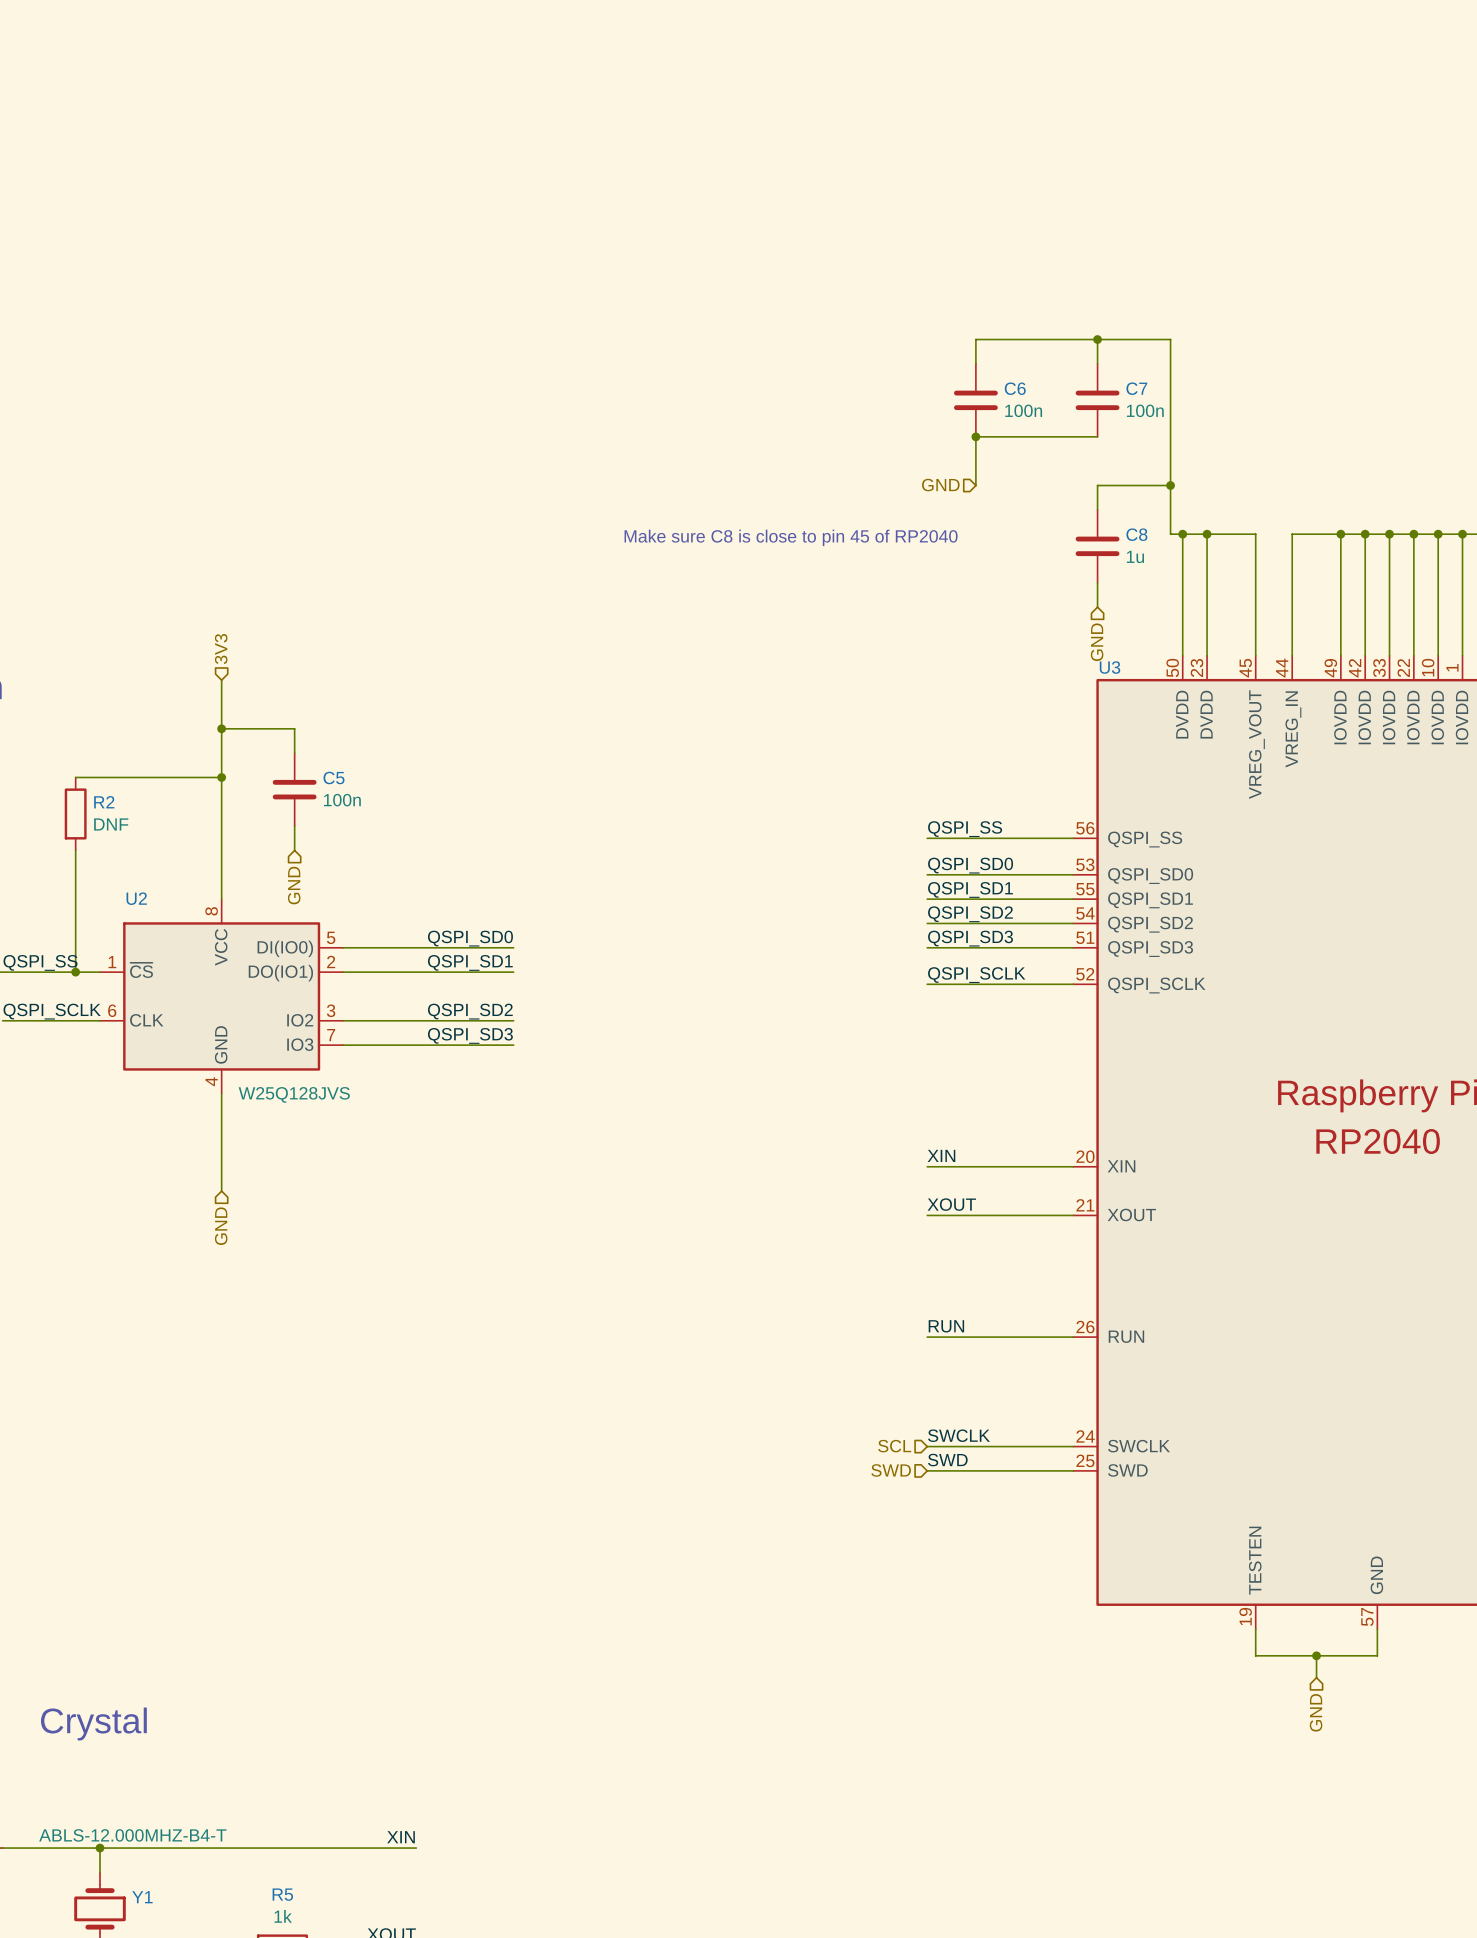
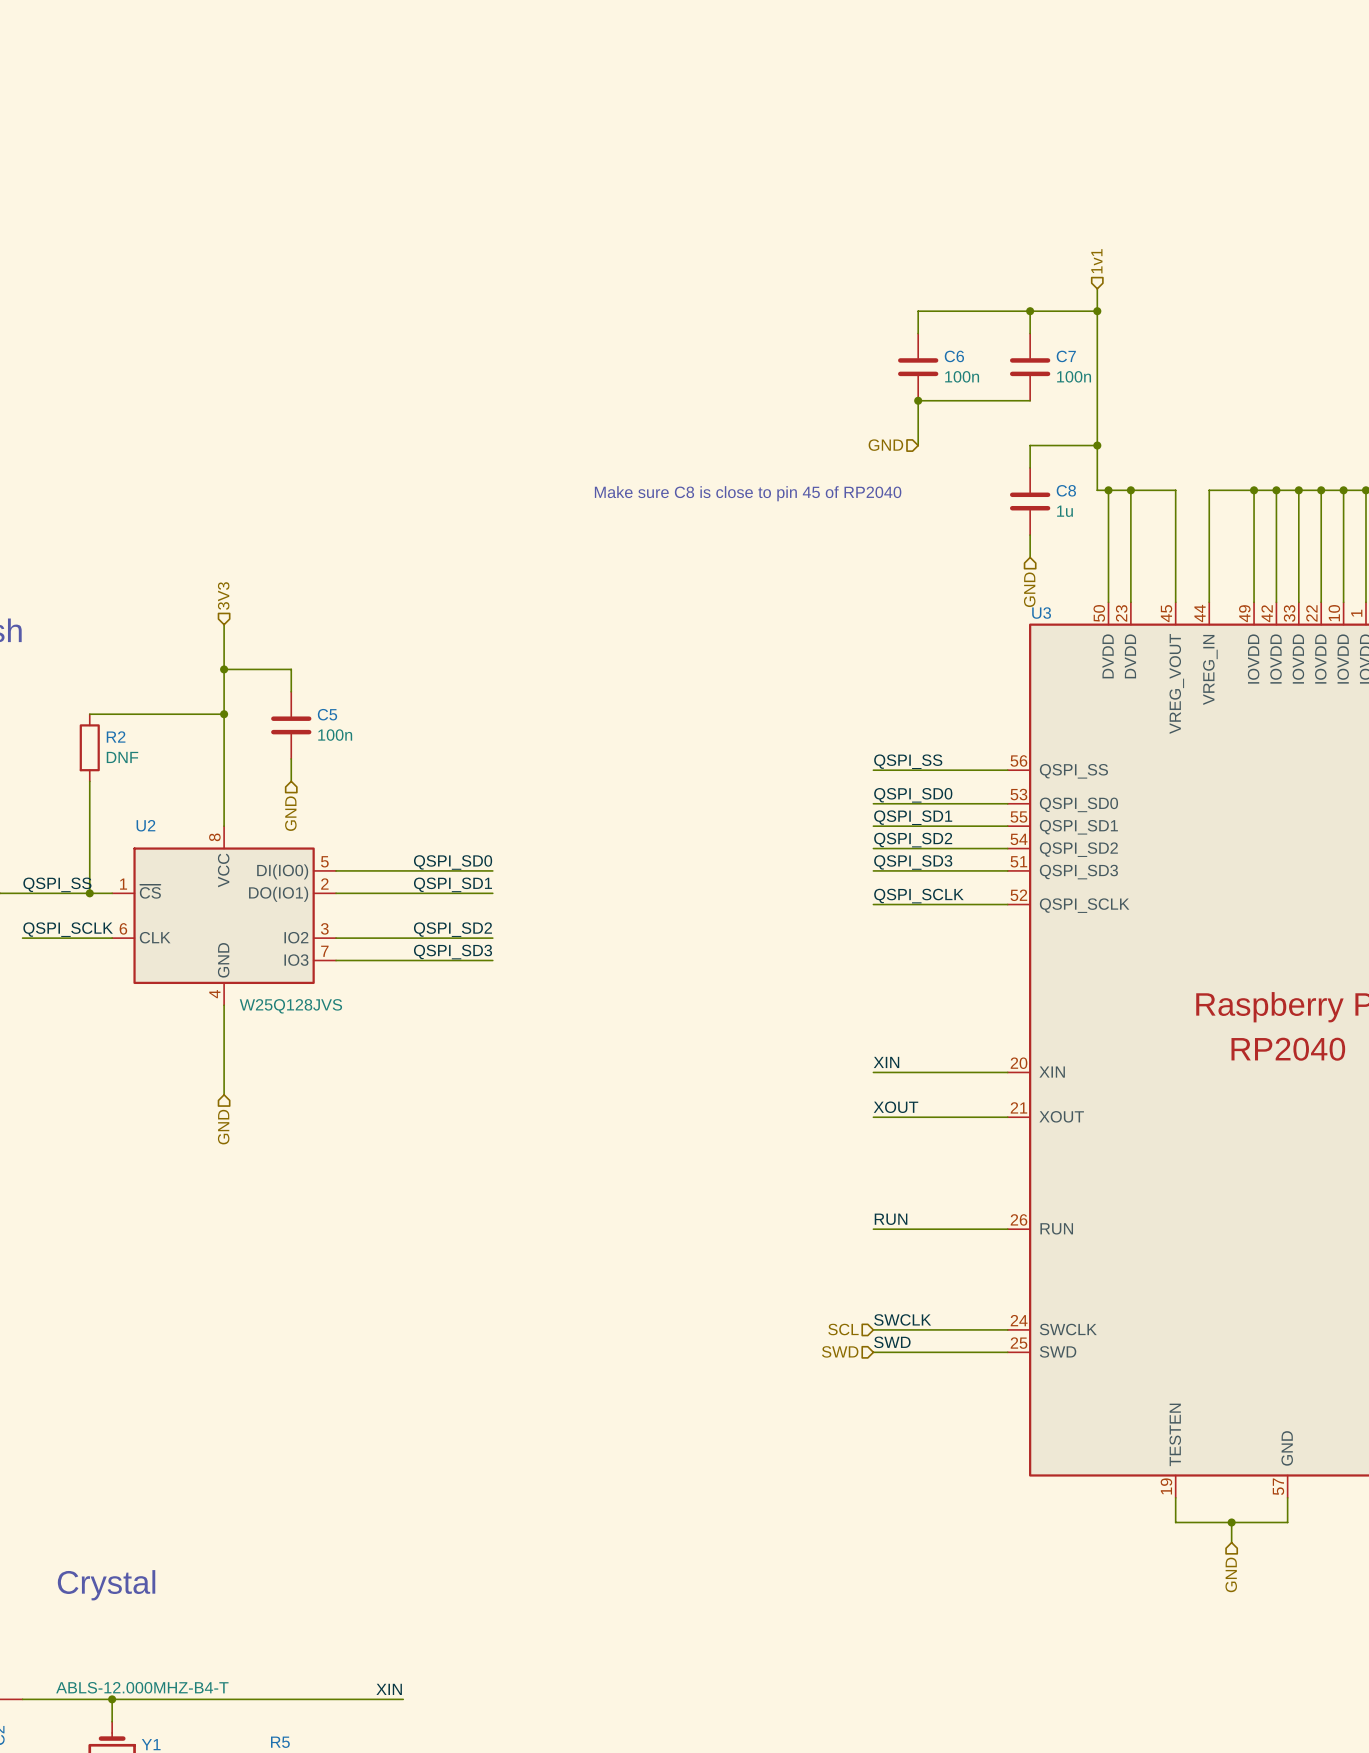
hierarchical label: none -> 1v1 (1096, 261)
wire: none -> (1097, 288) (1097, 311)
junction: none -> (1097, 311)

